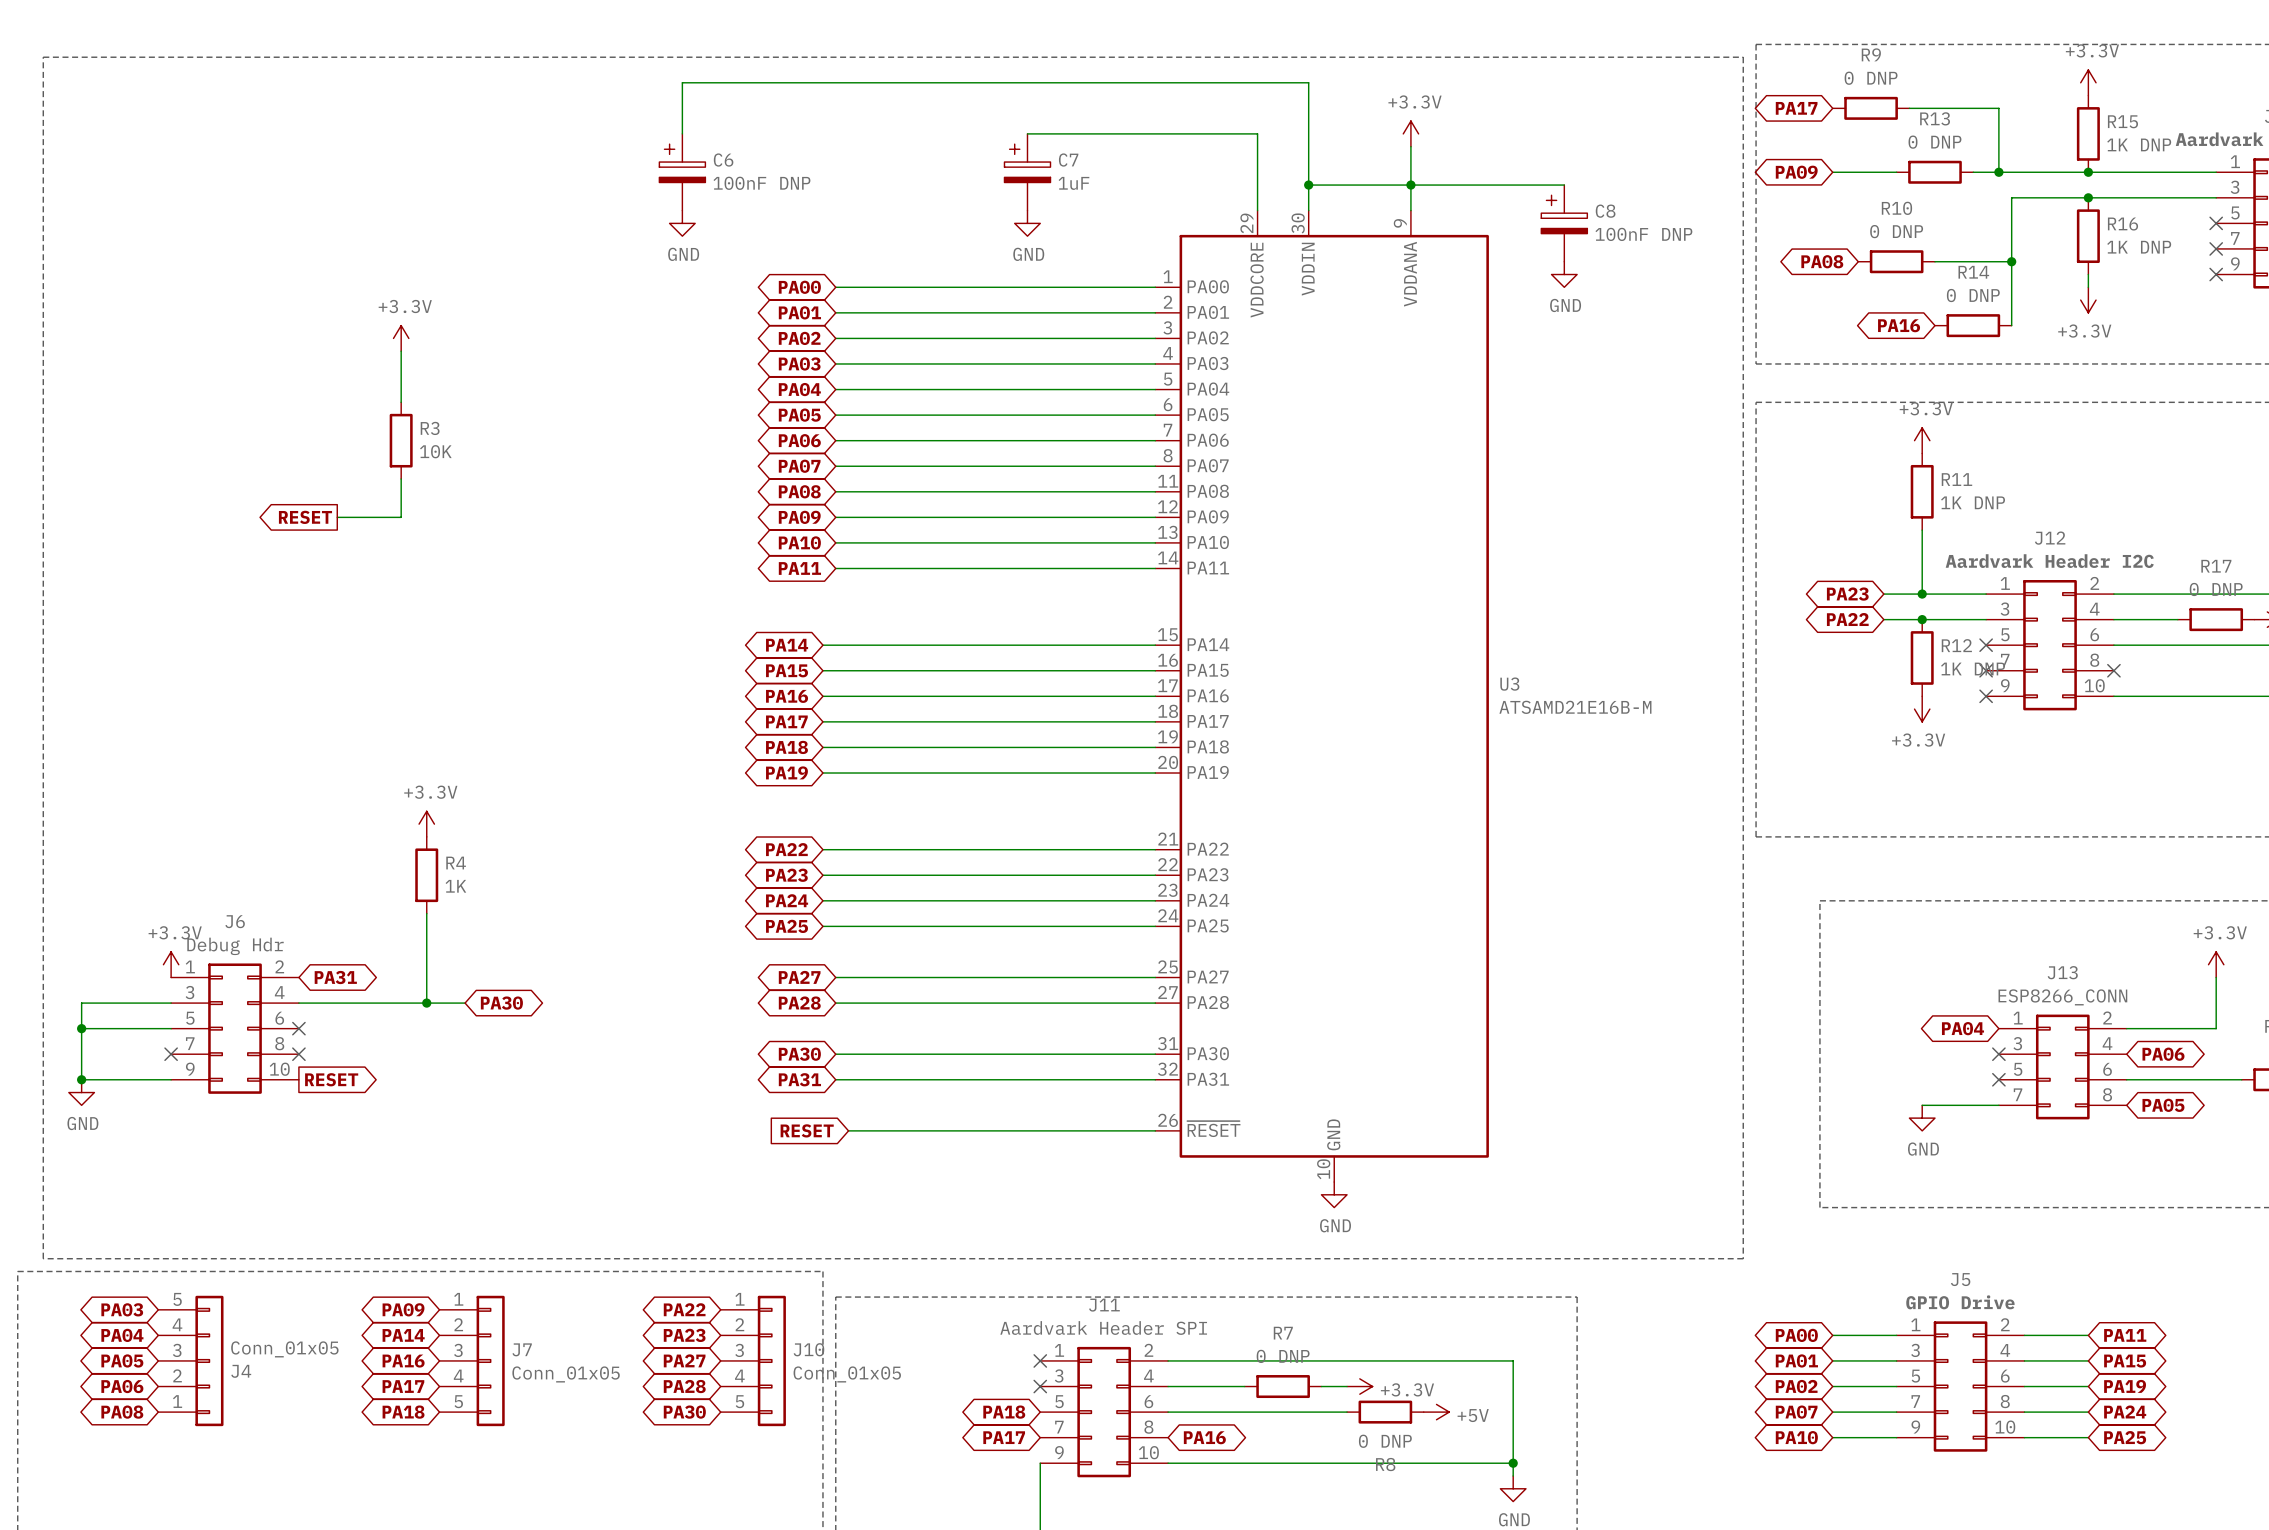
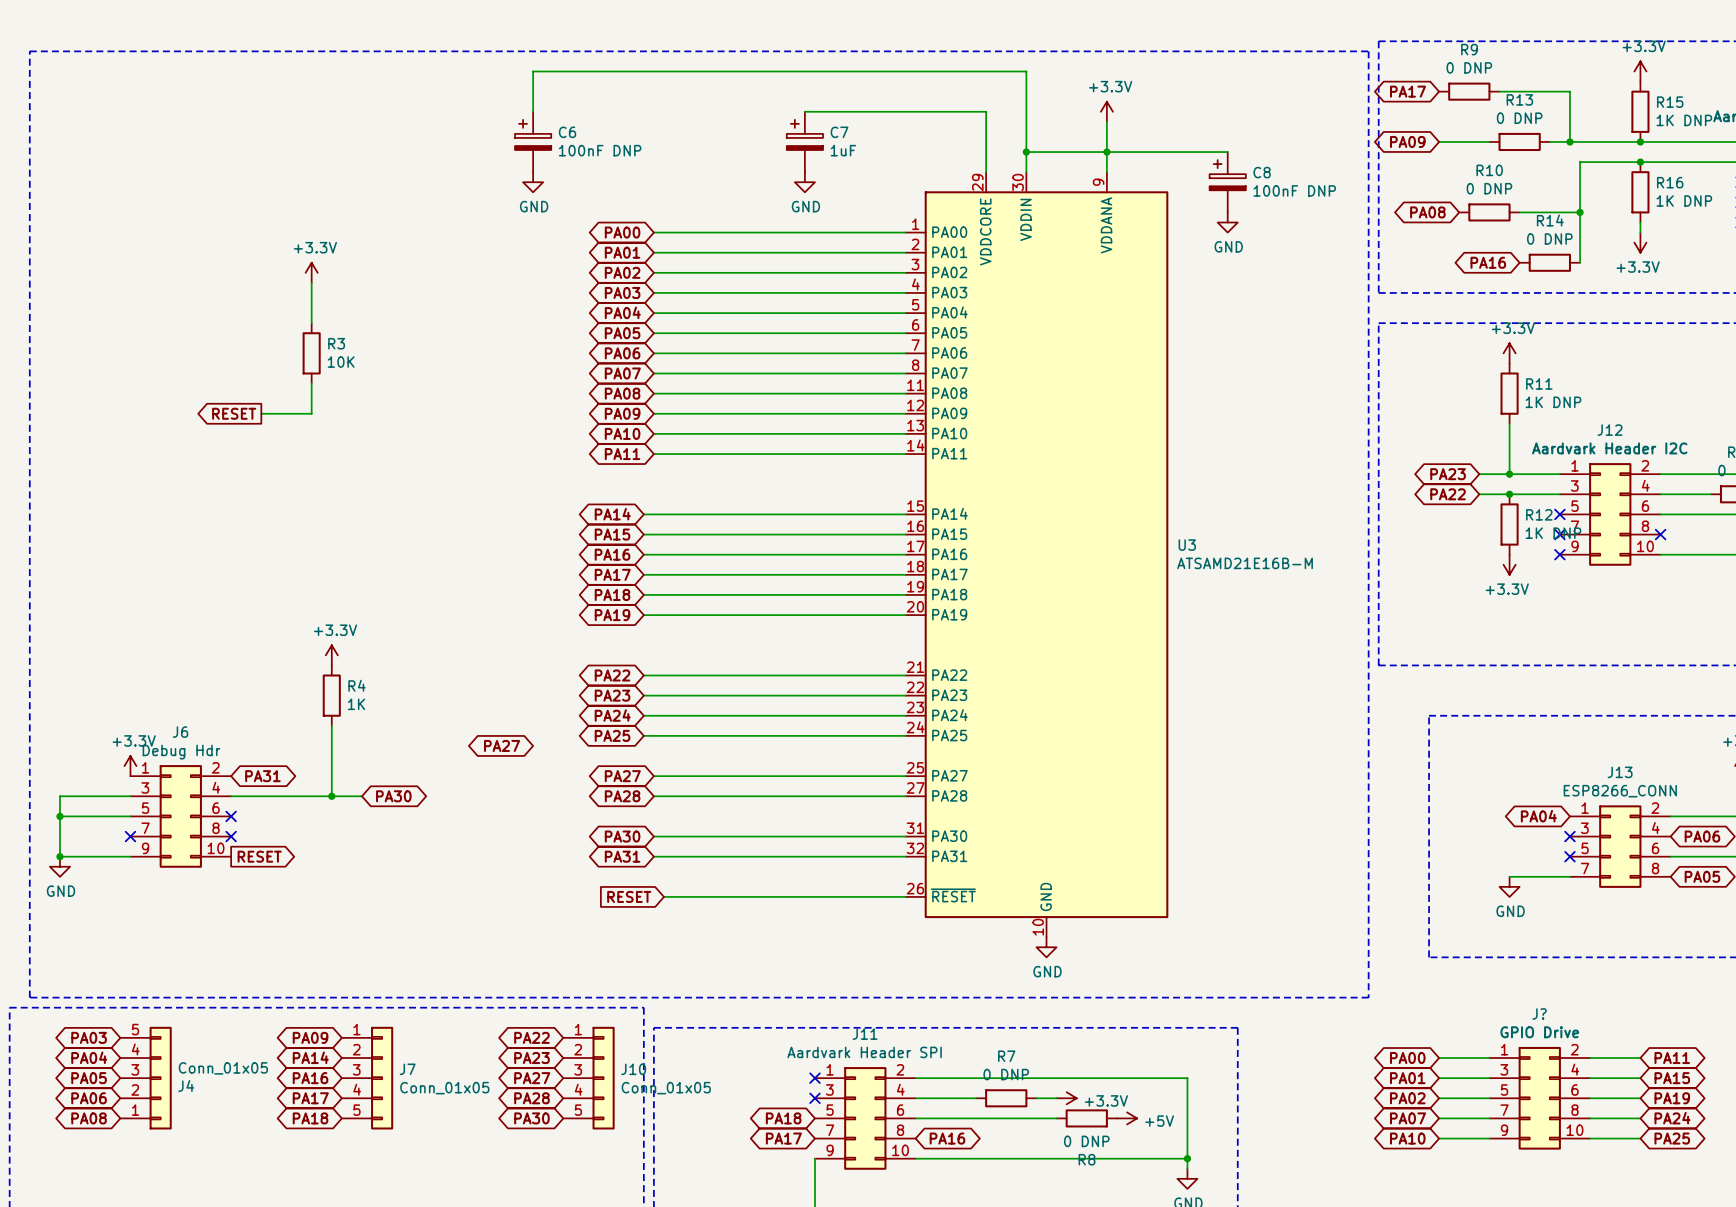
global label: none -> PA27 (502, 745)
J5 name: J5 (1960, 1279) -> J? (1539, 1013)

